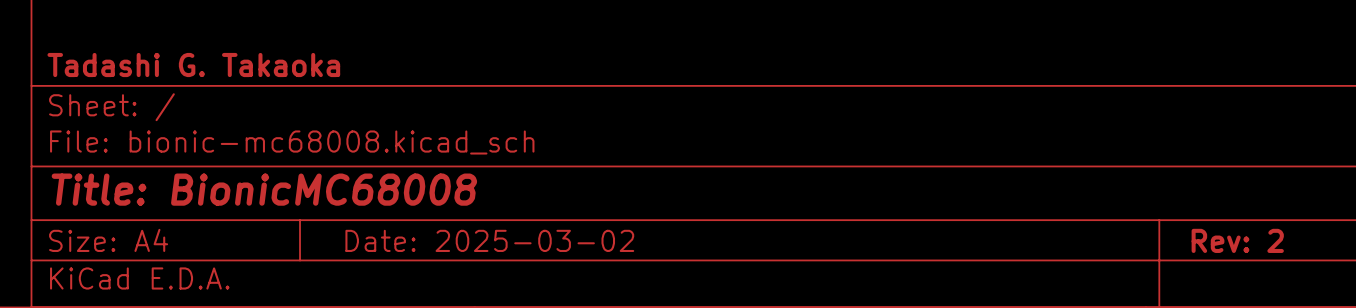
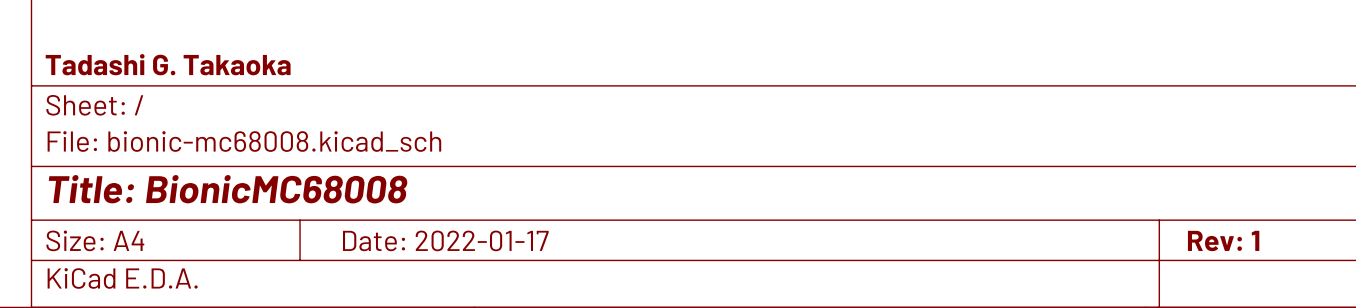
title block: Date: 2025-03-02 (489, 240) -> Date: 2022-01-17 (445, 240)
title block: Rev: 2 (1237, 240) -> Rev: 1 (1223, 241)

